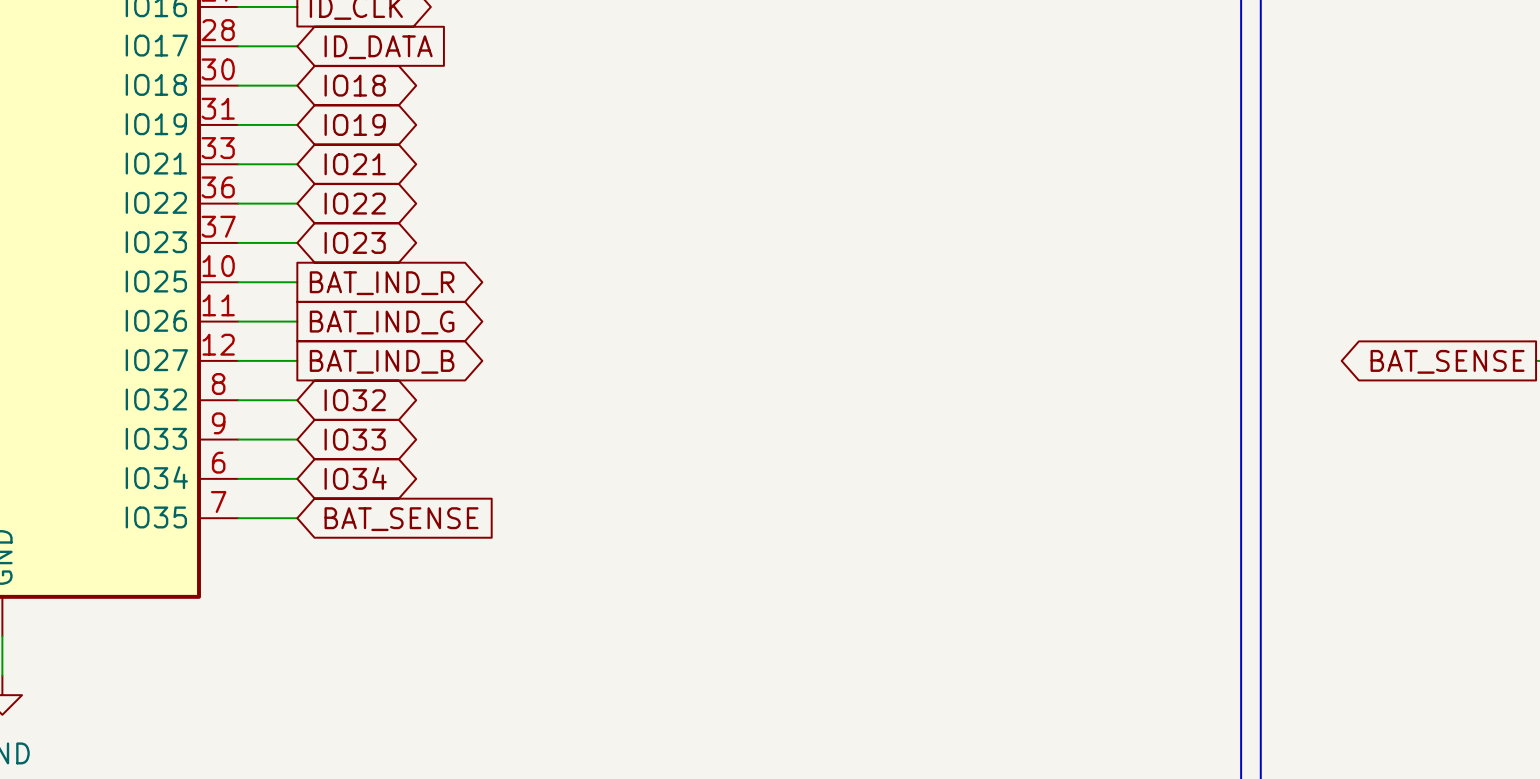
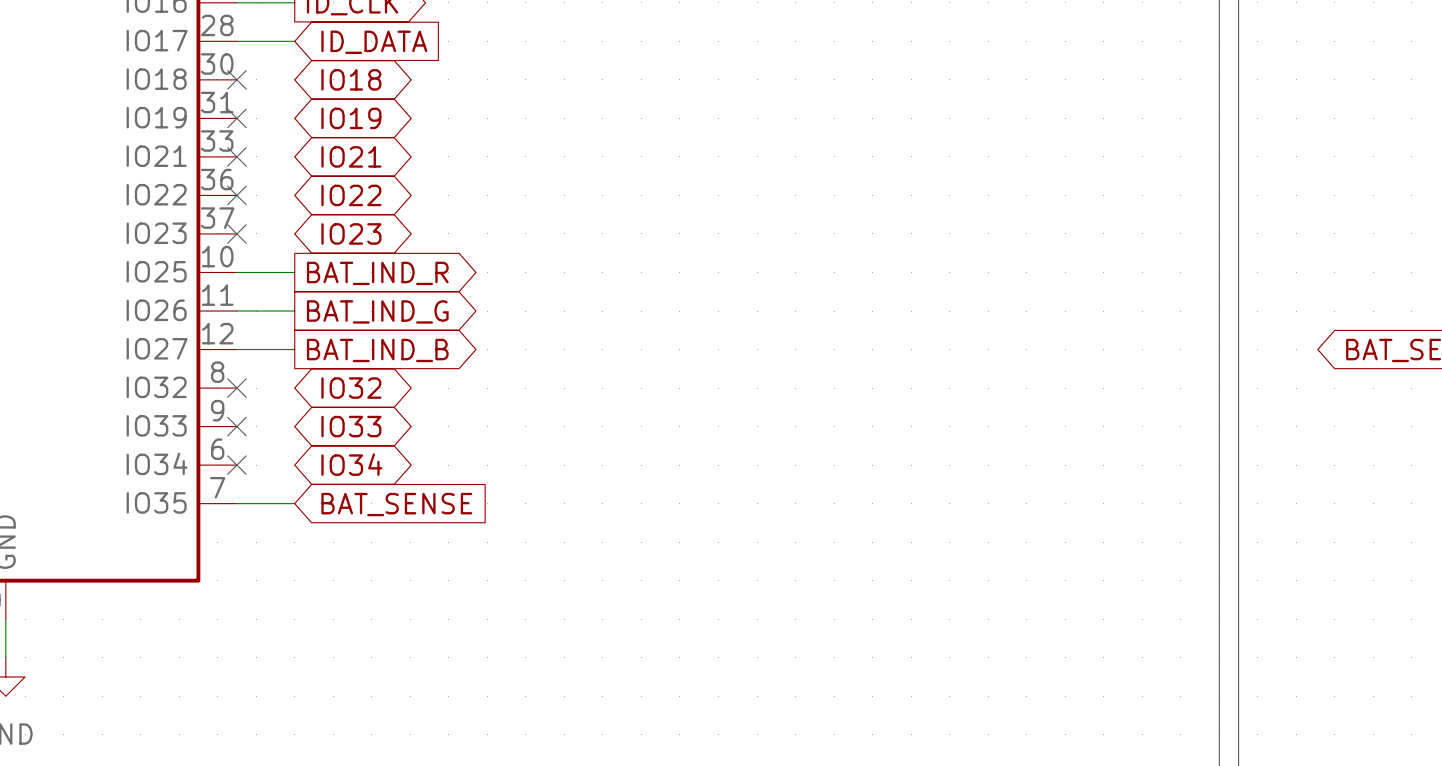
wire: (238, 85) (297, 85) -> none
no-connect mark: none -> (236, 79)
wire: (238, 124) (297, 124) -> none
no-connect mark: none -> (236, 118)
wire: (238, 164) (297, 164) -> none
no-connect mark: none -> (236, 156)
wire: (238, 203) (297, 203) -> none
no-connect mark: none -> (236, 195)
wire: (238, 242) (297, 242) -> none
no-connect mark: none -> (236, 233)
wire: (238, 400) (297, 400) -> none
no-connect mark: none -> (236, 388)
wire: (238, 439) (297, 439) -> none
no-connect mark: none -> (236, 426)
wire: (238, 478) (297, 478) -> none
no-connect mark: none -> (236, 465)

